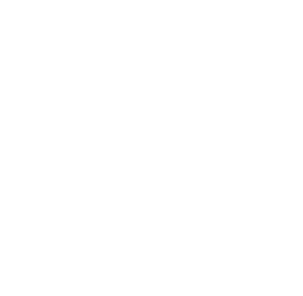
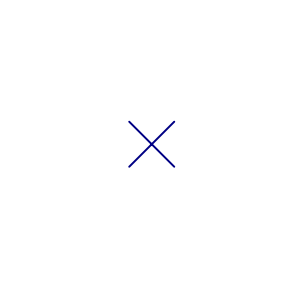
no-connect mark: none -> (151, 144)

